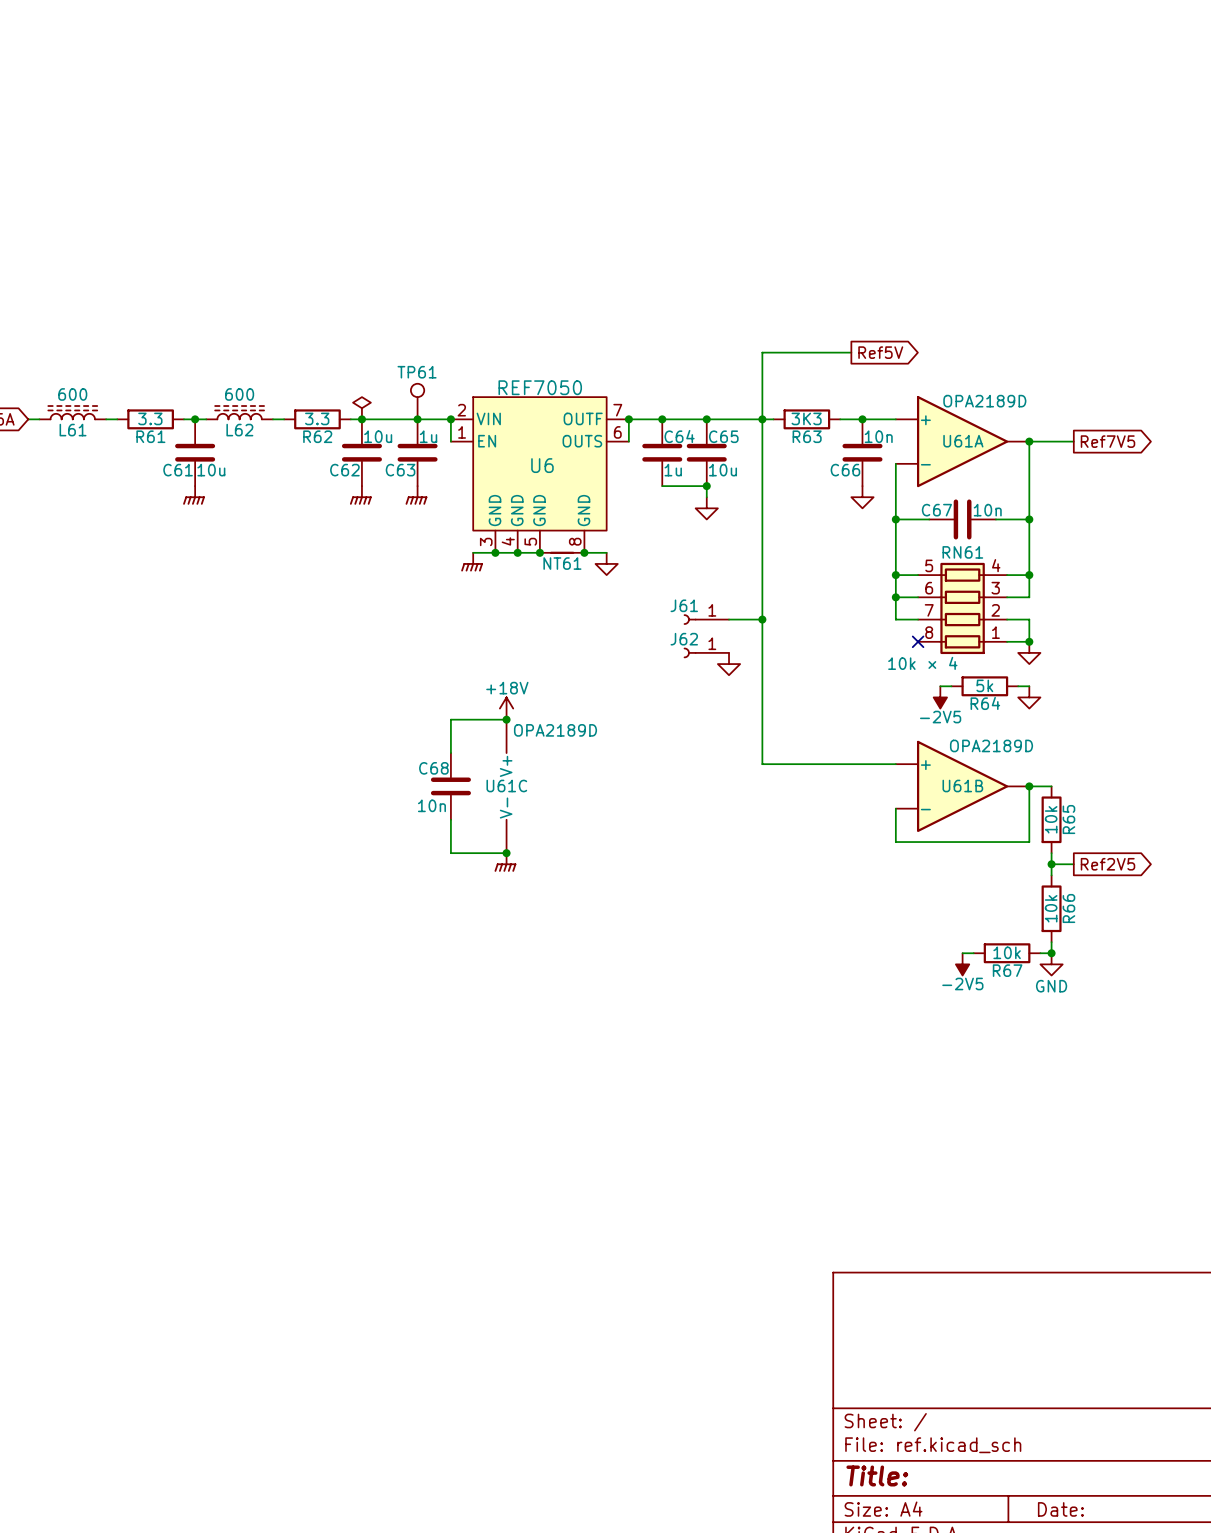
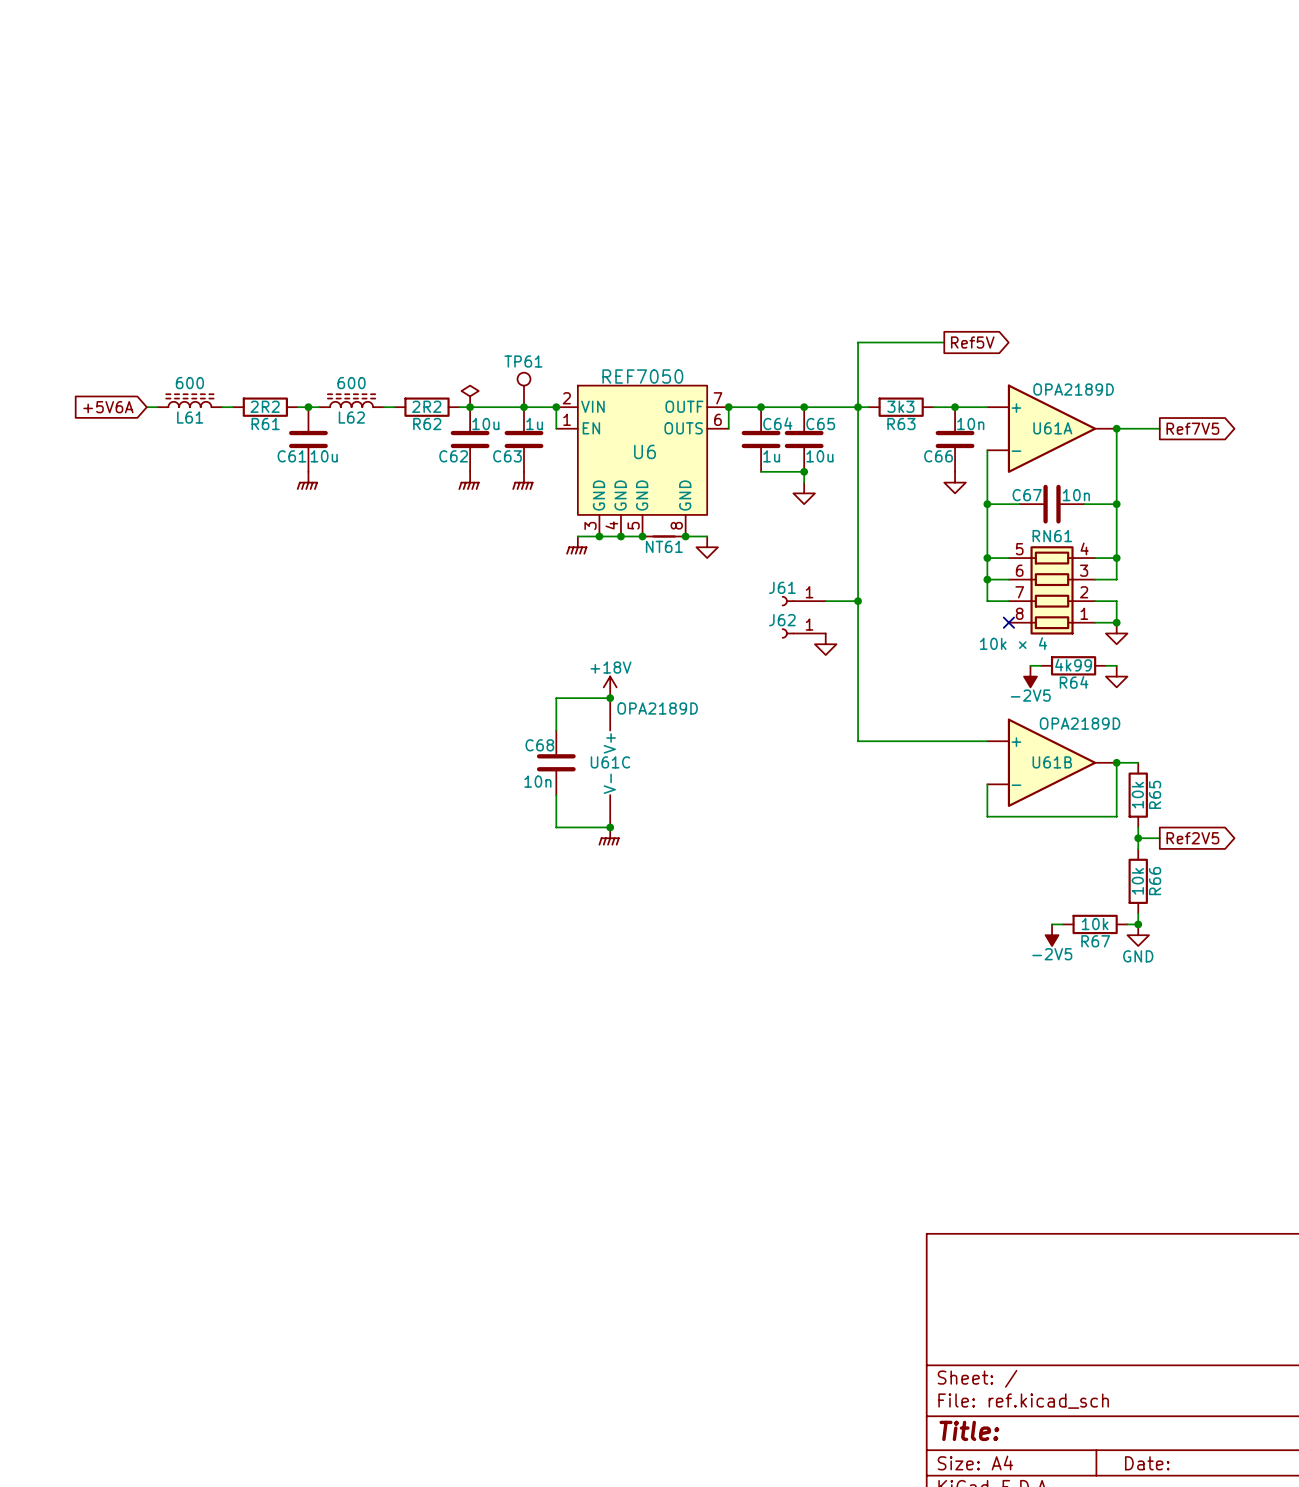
R61 value: 3.3 (150, 418) -> 2R2 (265, 406)
R62 value: 3.3 (317, 418) -> 2R2 (426, 406)
R63 value: 3K3 (806, 418) -> 3k3 (900, 406)
R64 value: 5k (984, 685) -> 4k99 (1073, 665)

